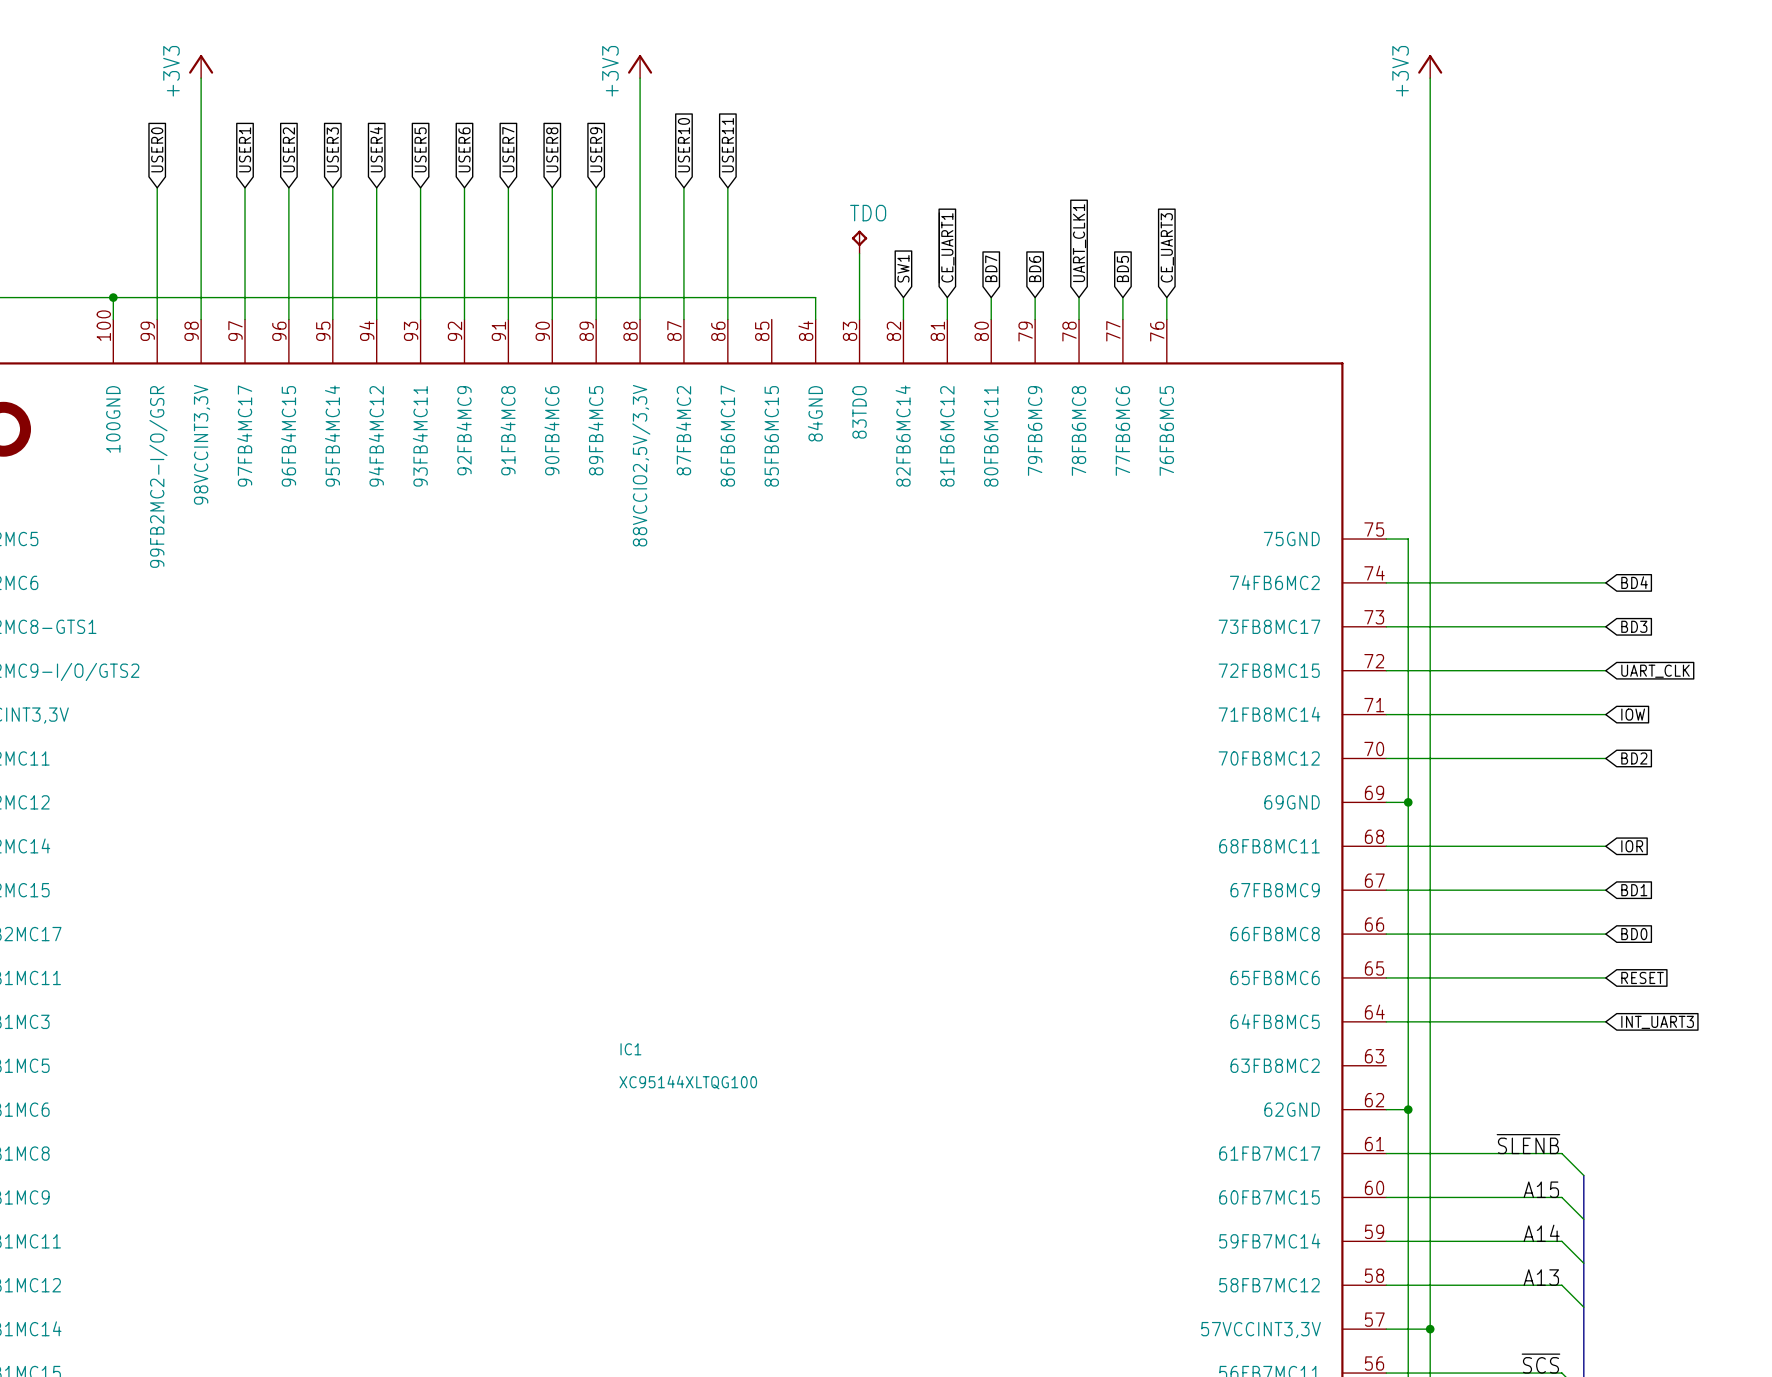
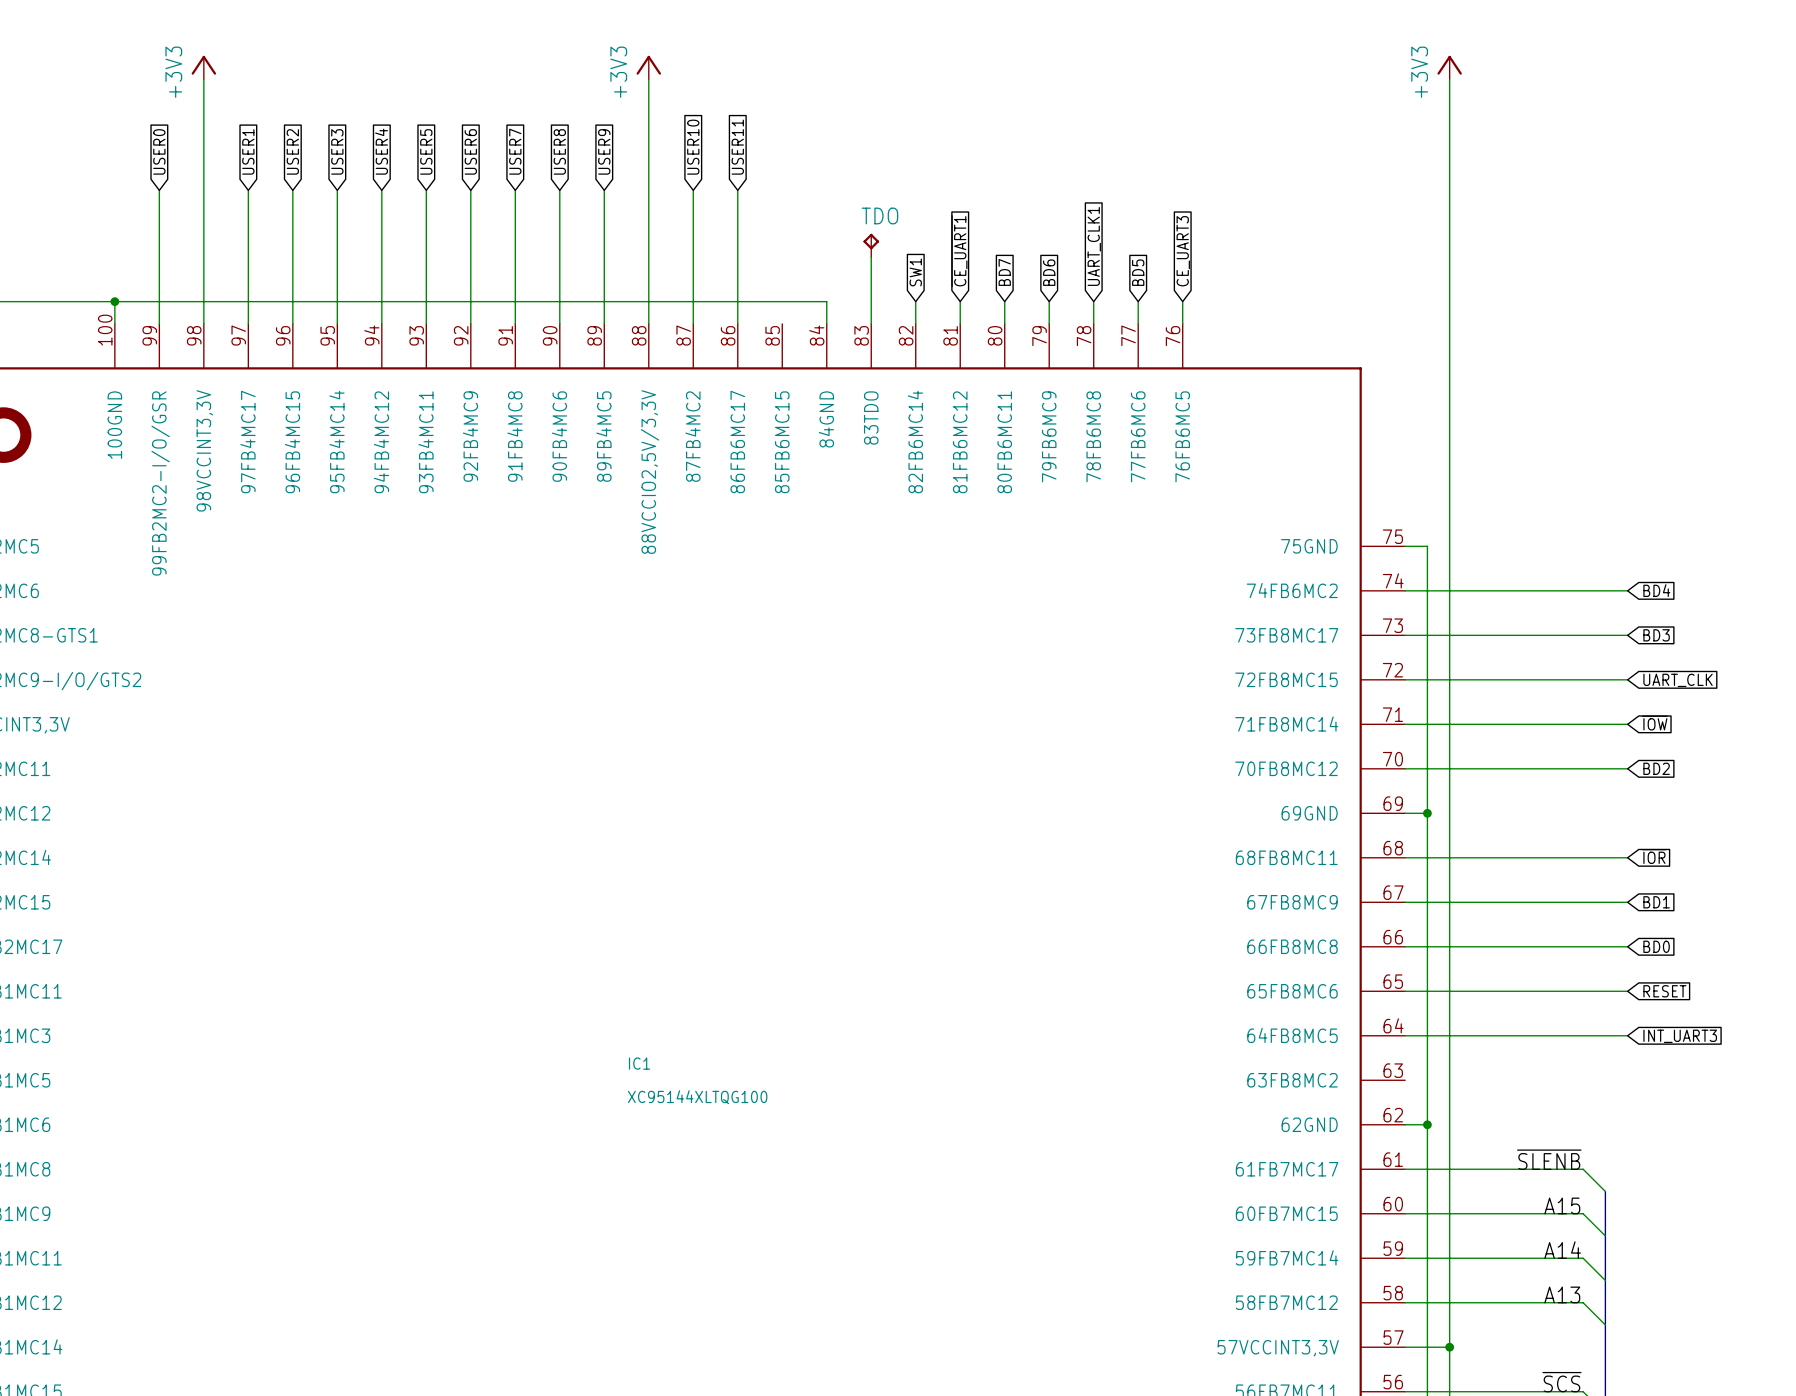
global label: IOW (1633, 714) -> ~{IOW} (1654, 723)
global label: IOR (1632, 846) -> ~{IOR} (1654, 856)

